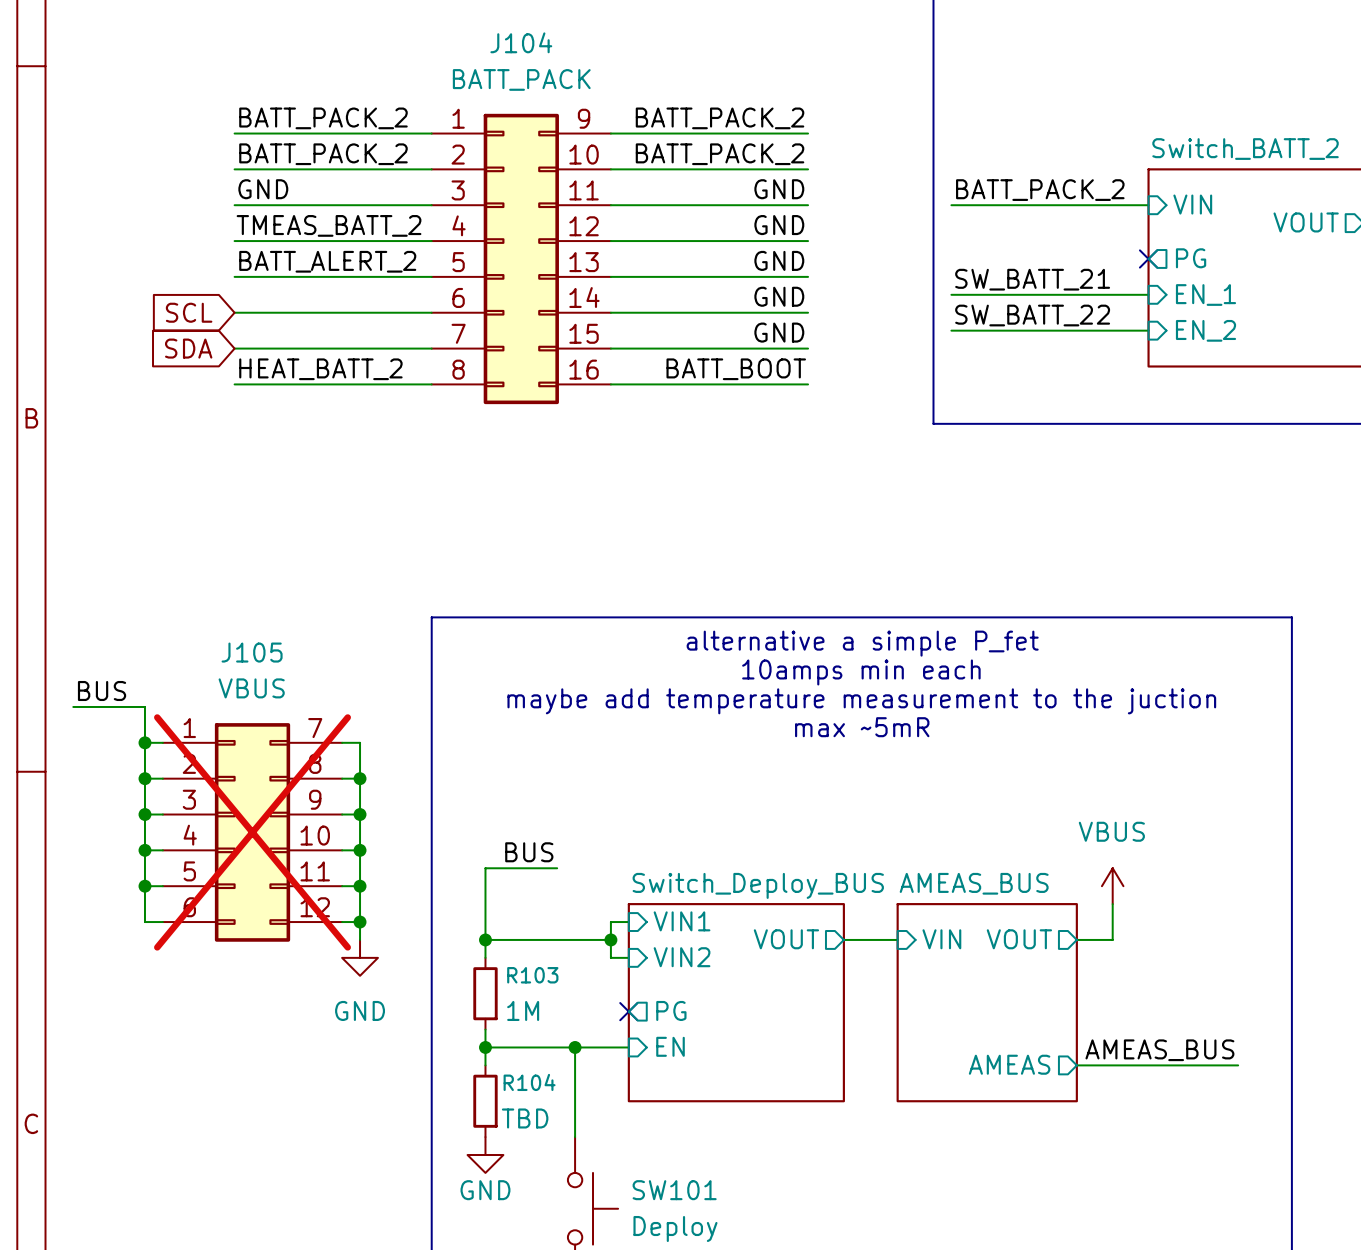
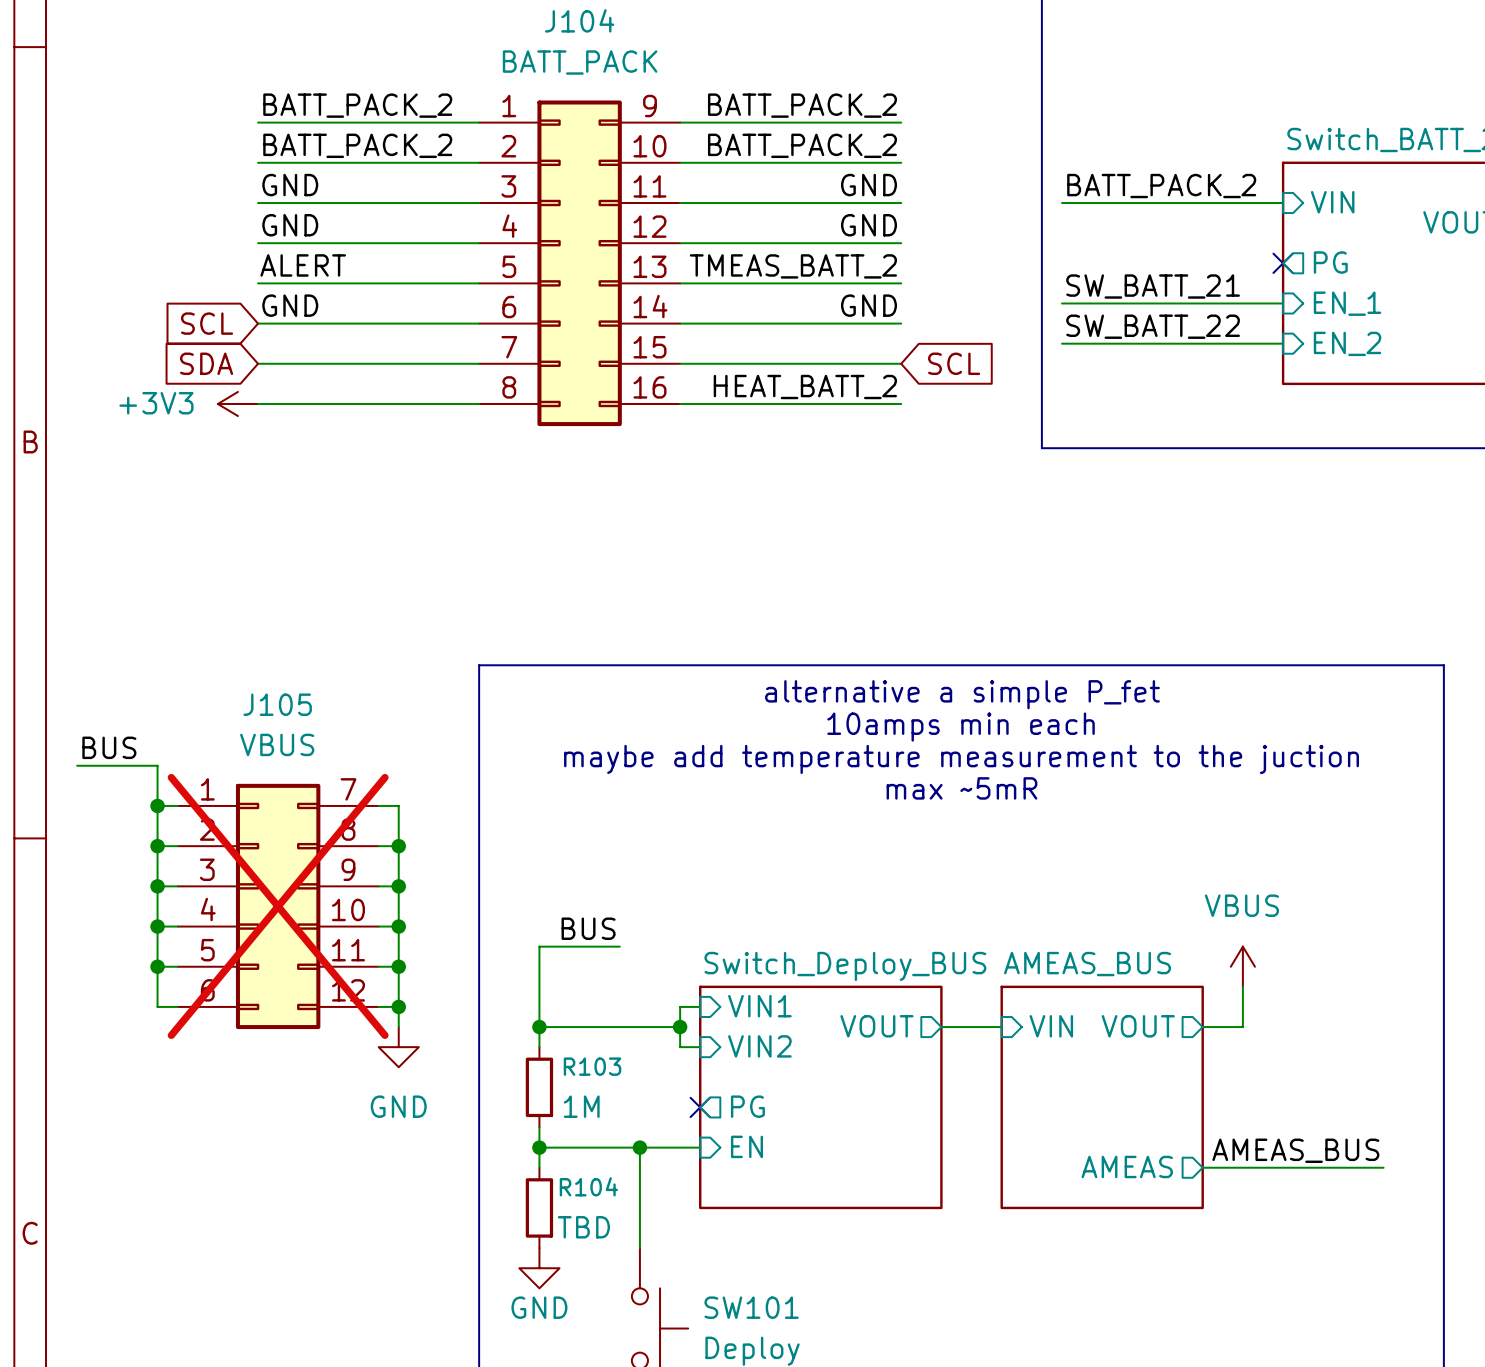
label: TMEAS_BATT_2 (329, 225) -> GND (290, 225)
label: GND (779, 260) -> TMEAS_BATT_2 (793, 266)
label: BATT_ALERT_2 (327, 261) -> ALERT (303, 265)
label: none -> GND (290, 305)
label: GND (779, 332) -> none
global label: none -> SCL (954, 363)
label: HEAT_BATT_2 (320, 369) -> none
label: BATT_BOOT (736, 369) -> HEAT_BATT_2 (805, 387)
power symbol: none -> +3V3 (237, 403)

